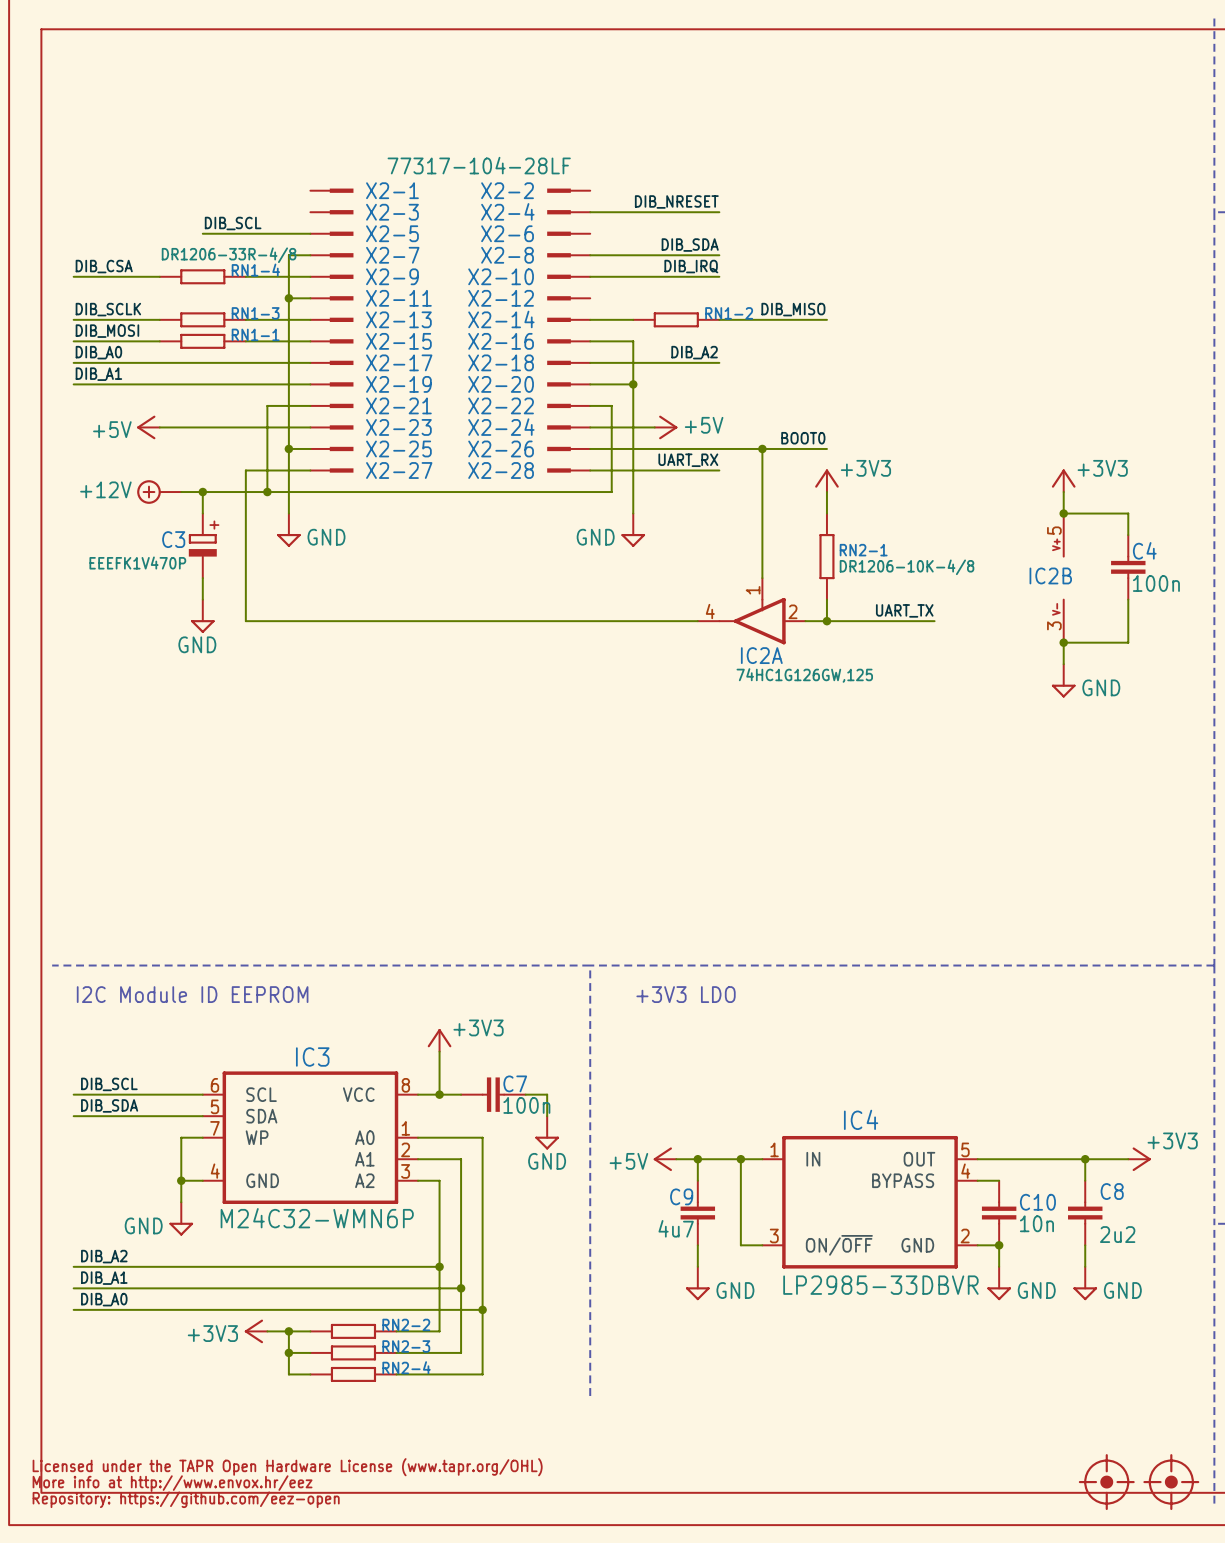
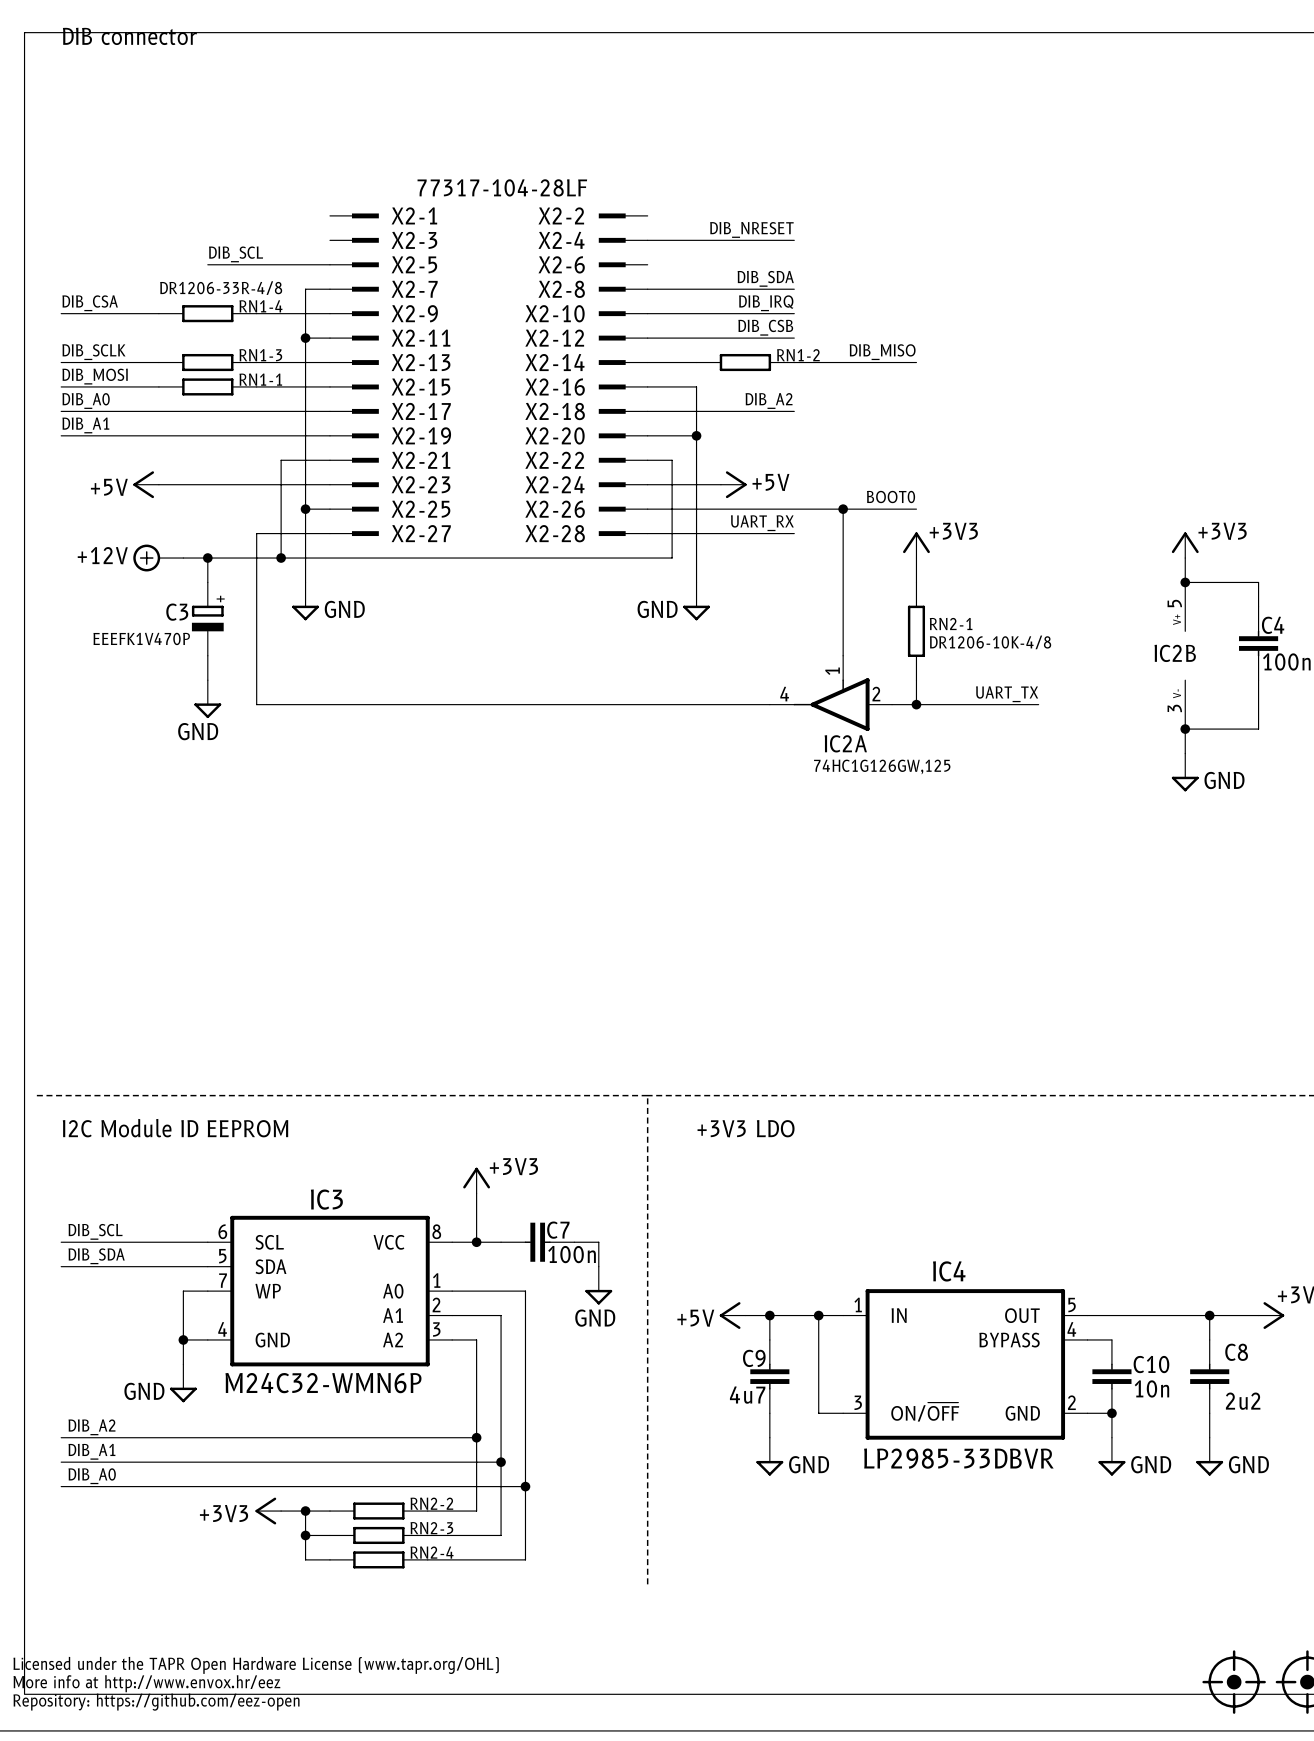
text: none -> DIB connector (129, 36)
label: none -> DIB_CSB (765, 327)
wire: none -> (647, 338) (794, 338)

